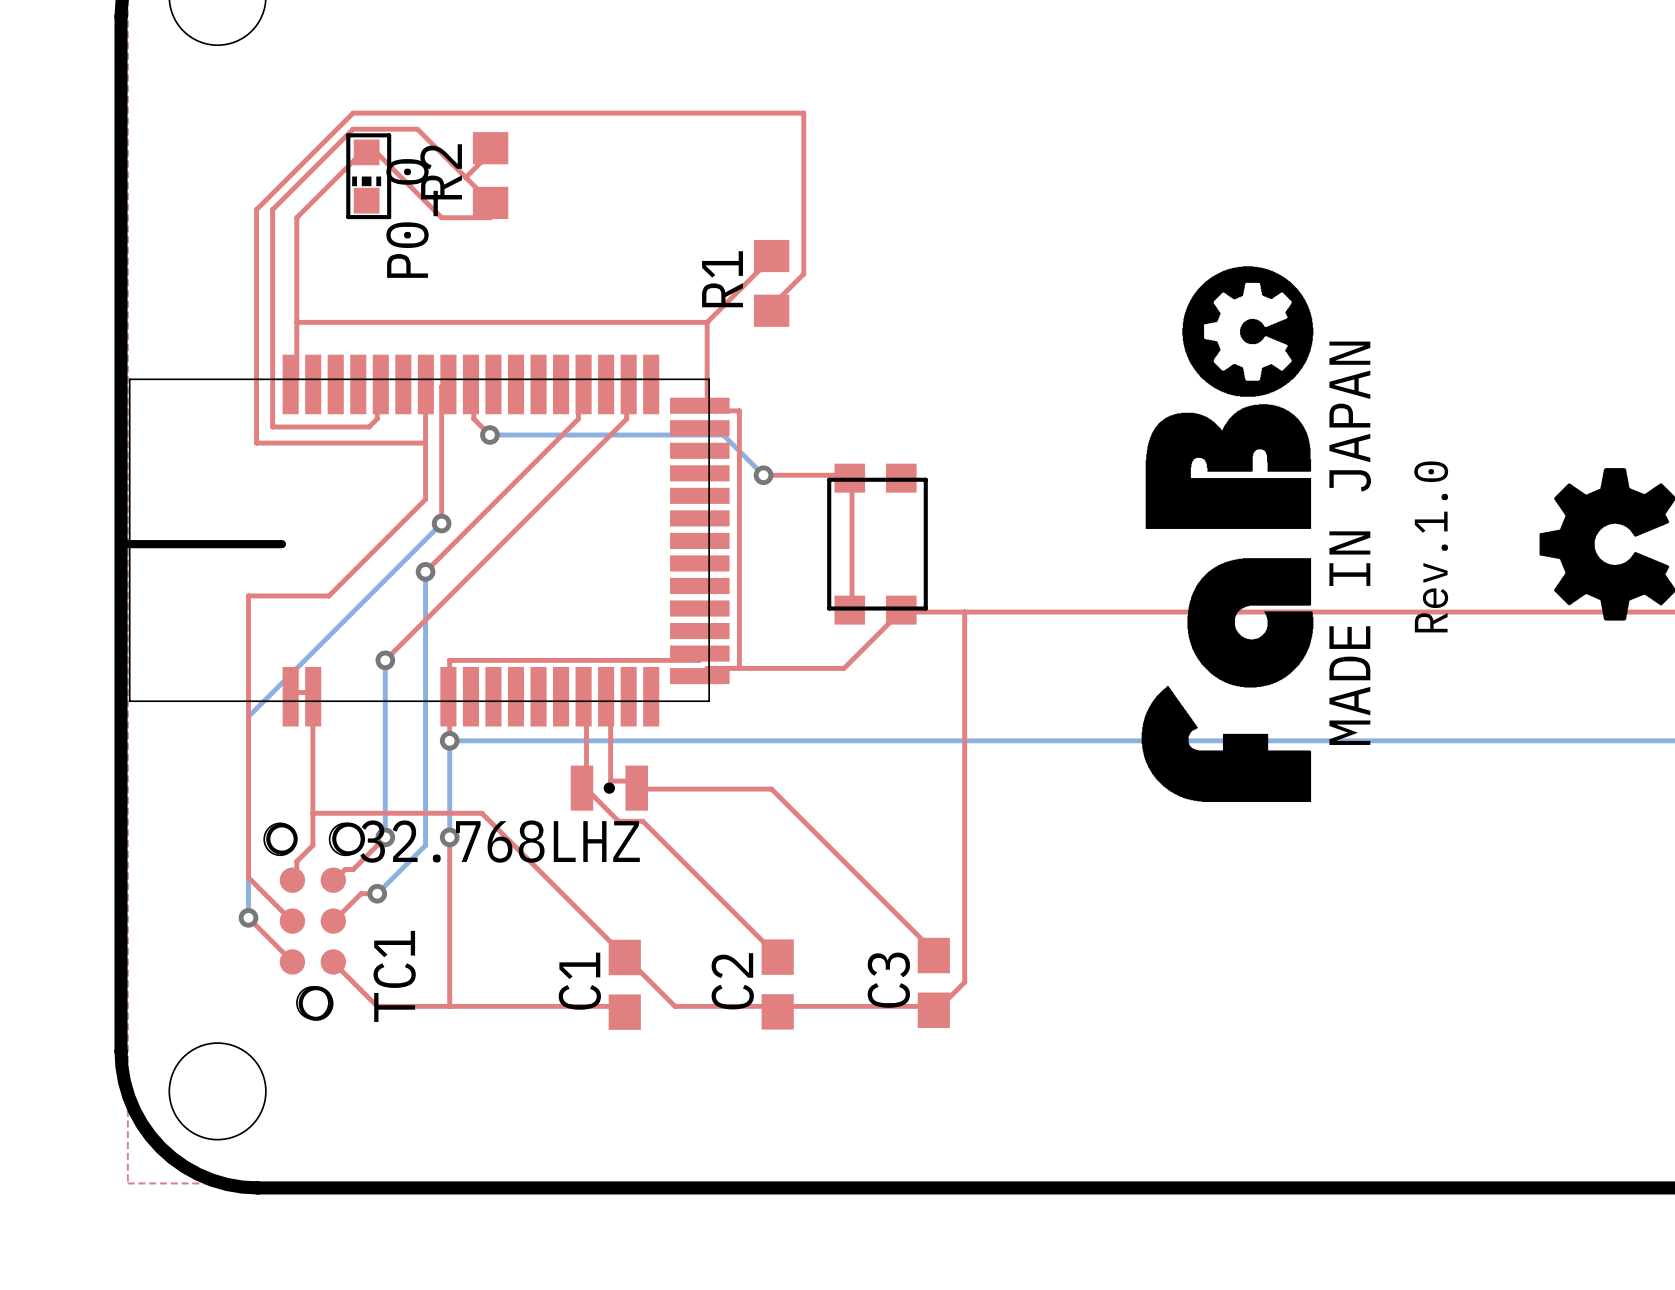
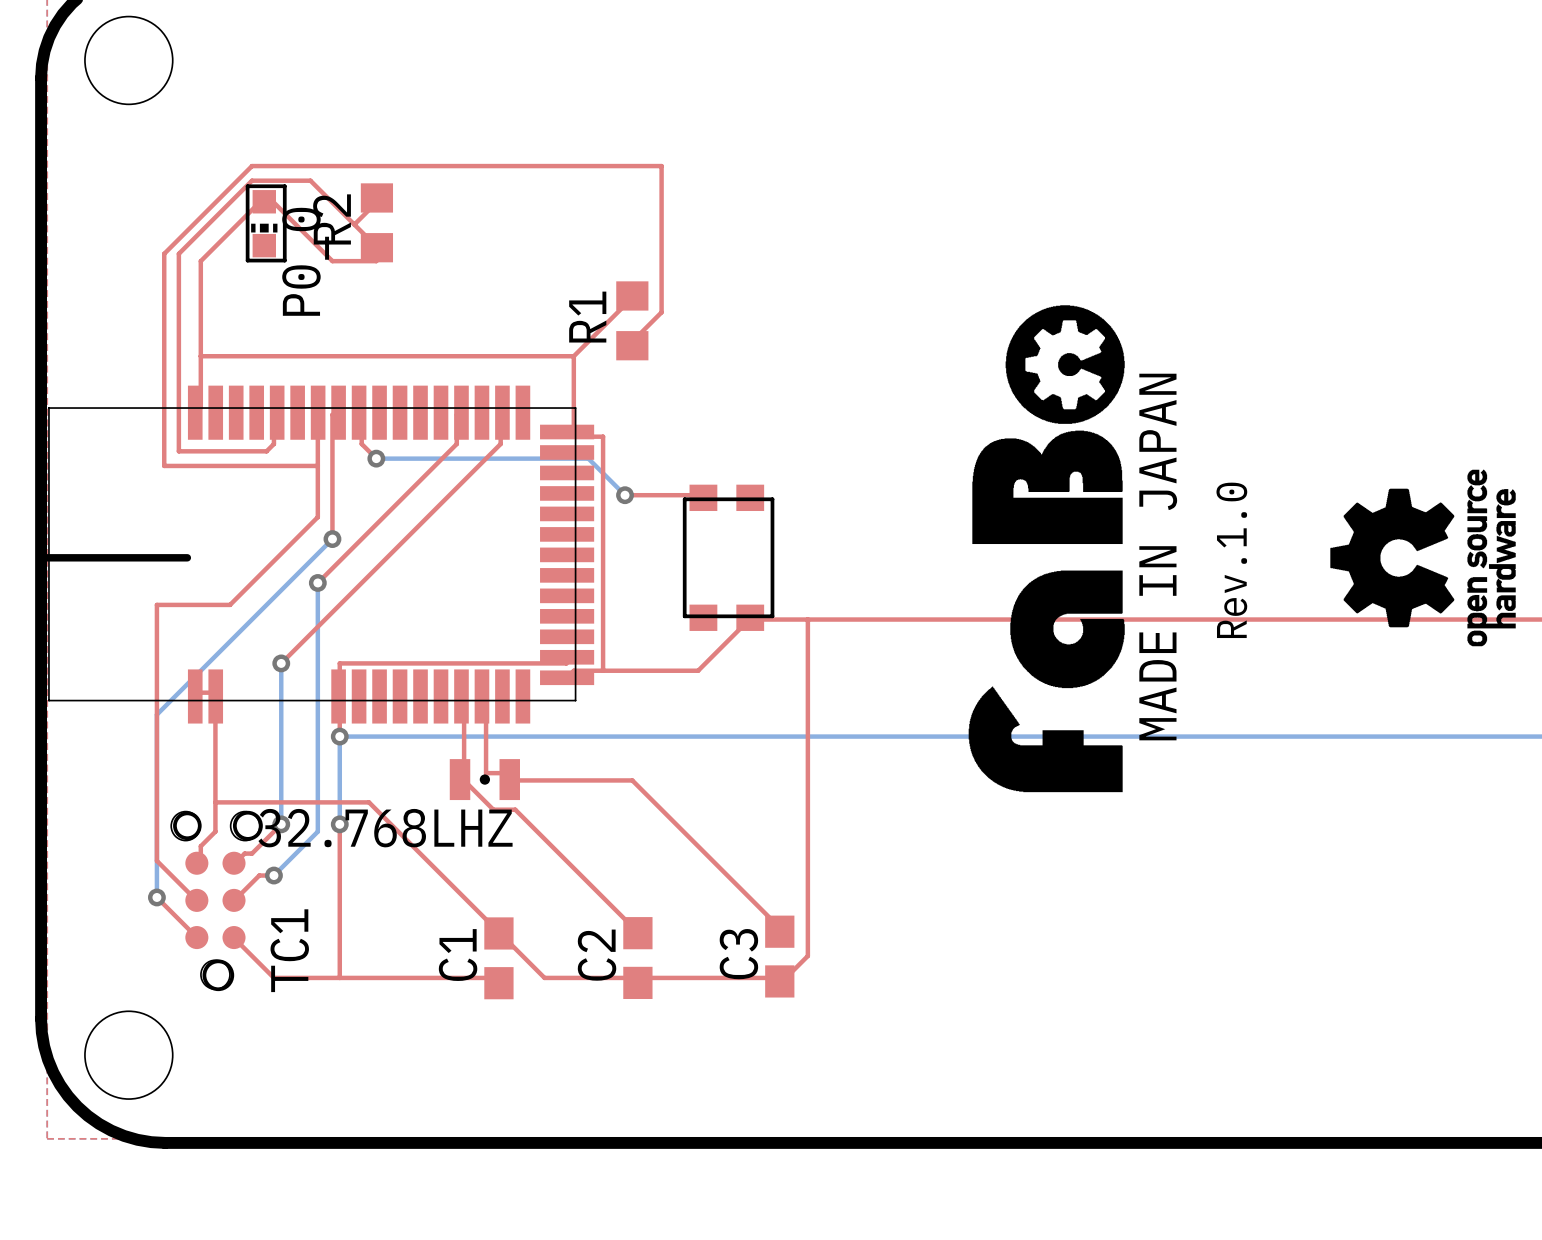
top track: (849, 478) (852, 483) (852, 604) (849, 610) -> none

